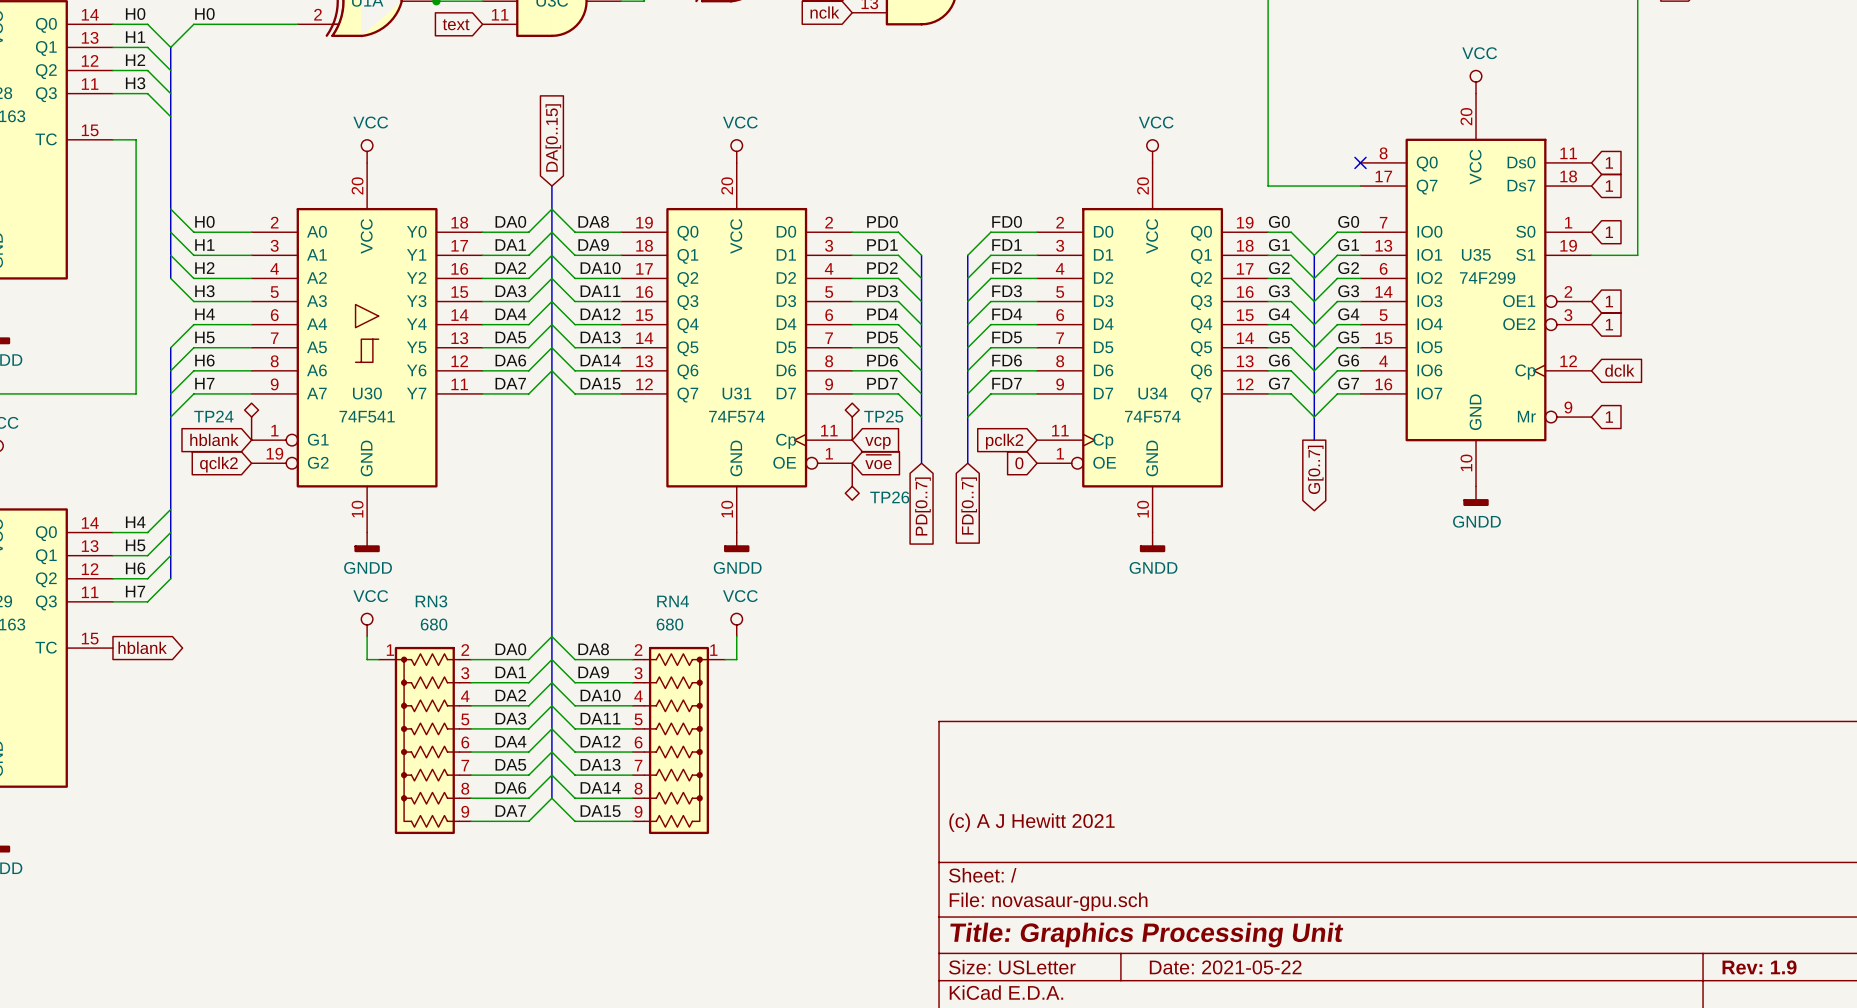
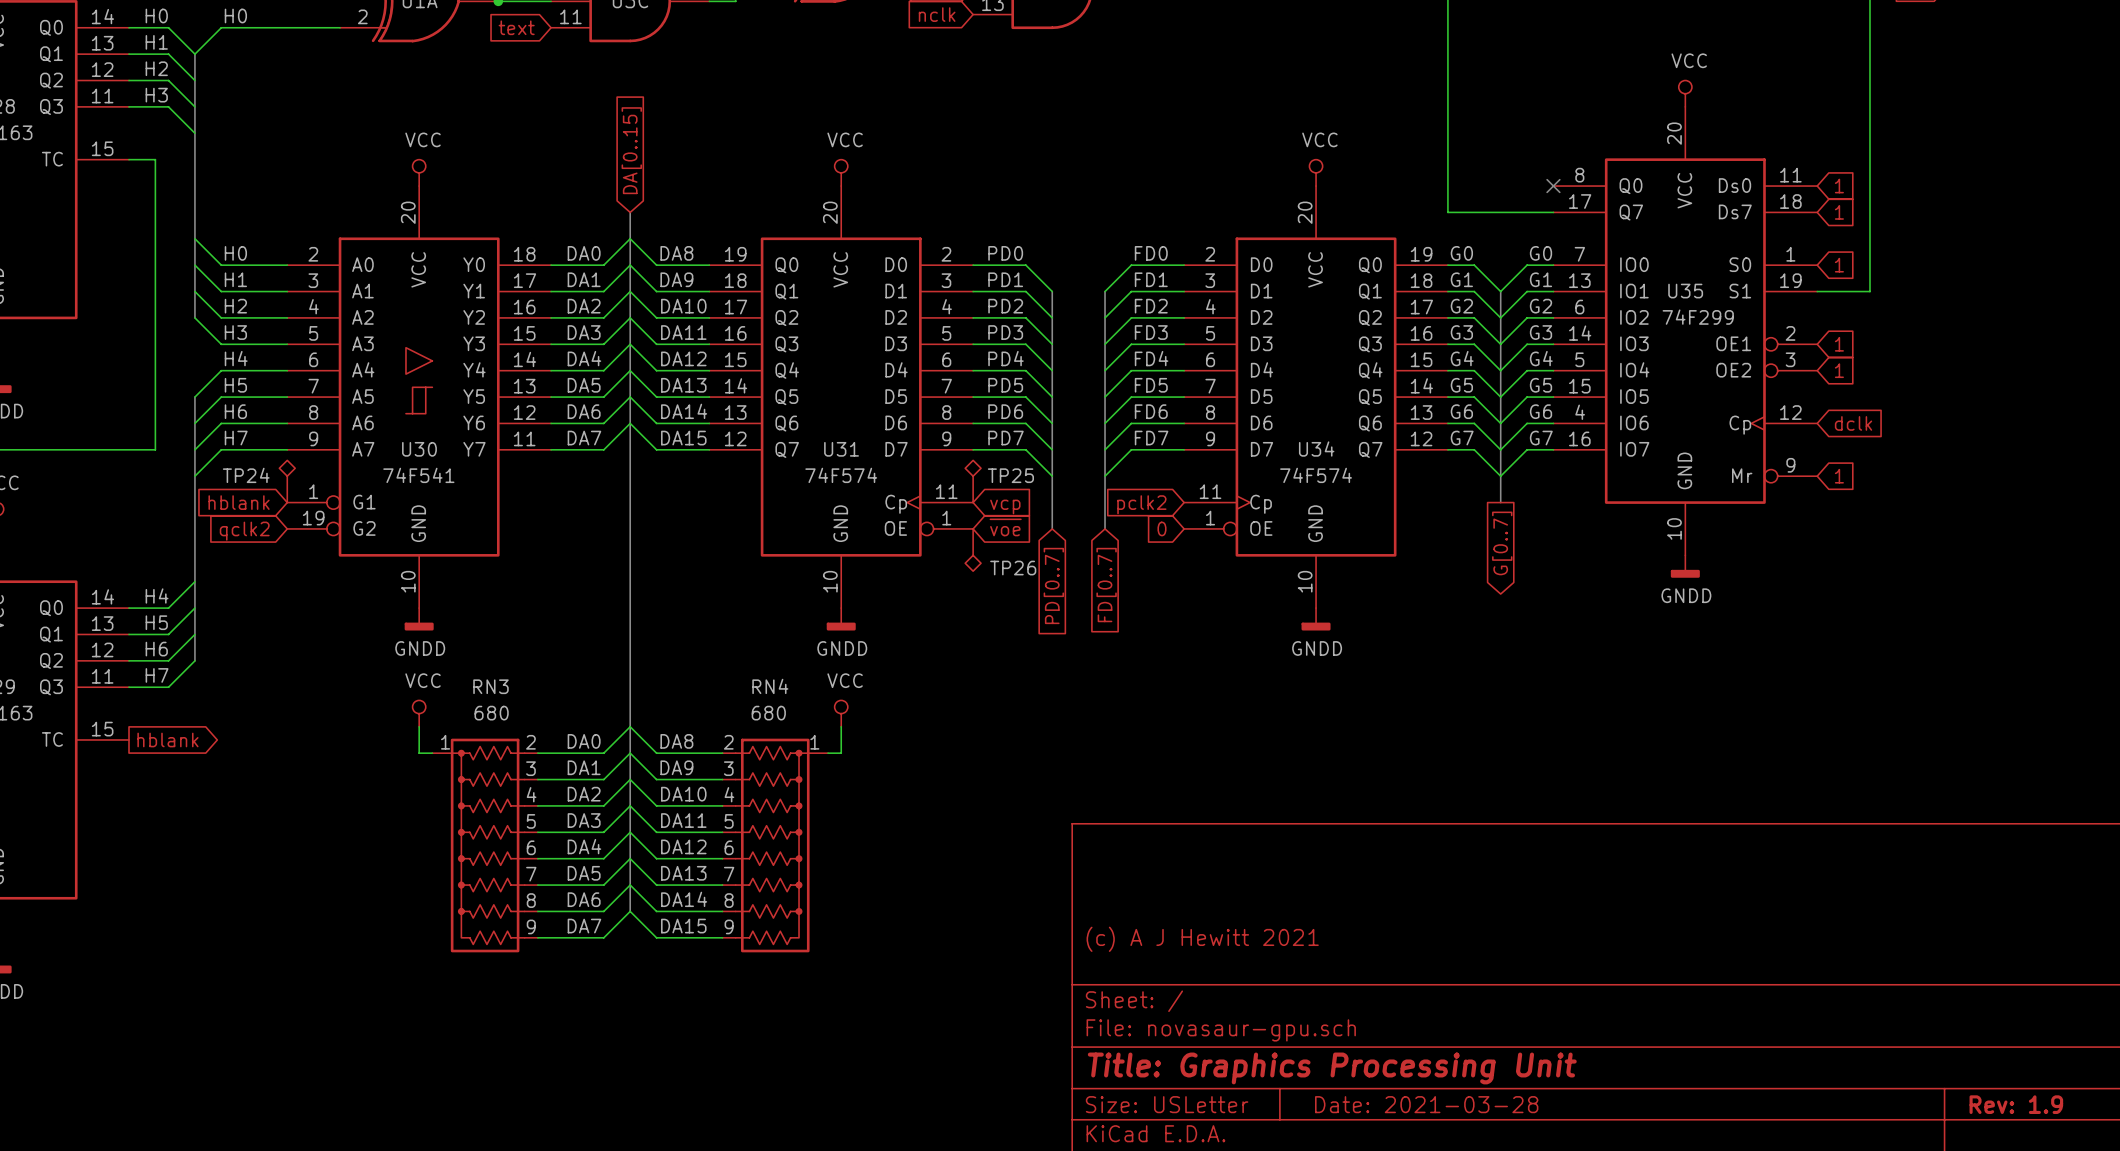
title block: Date: 2021-05-22 (1225, 967) -> Date: 2021-03-28 (1426, 1104)

